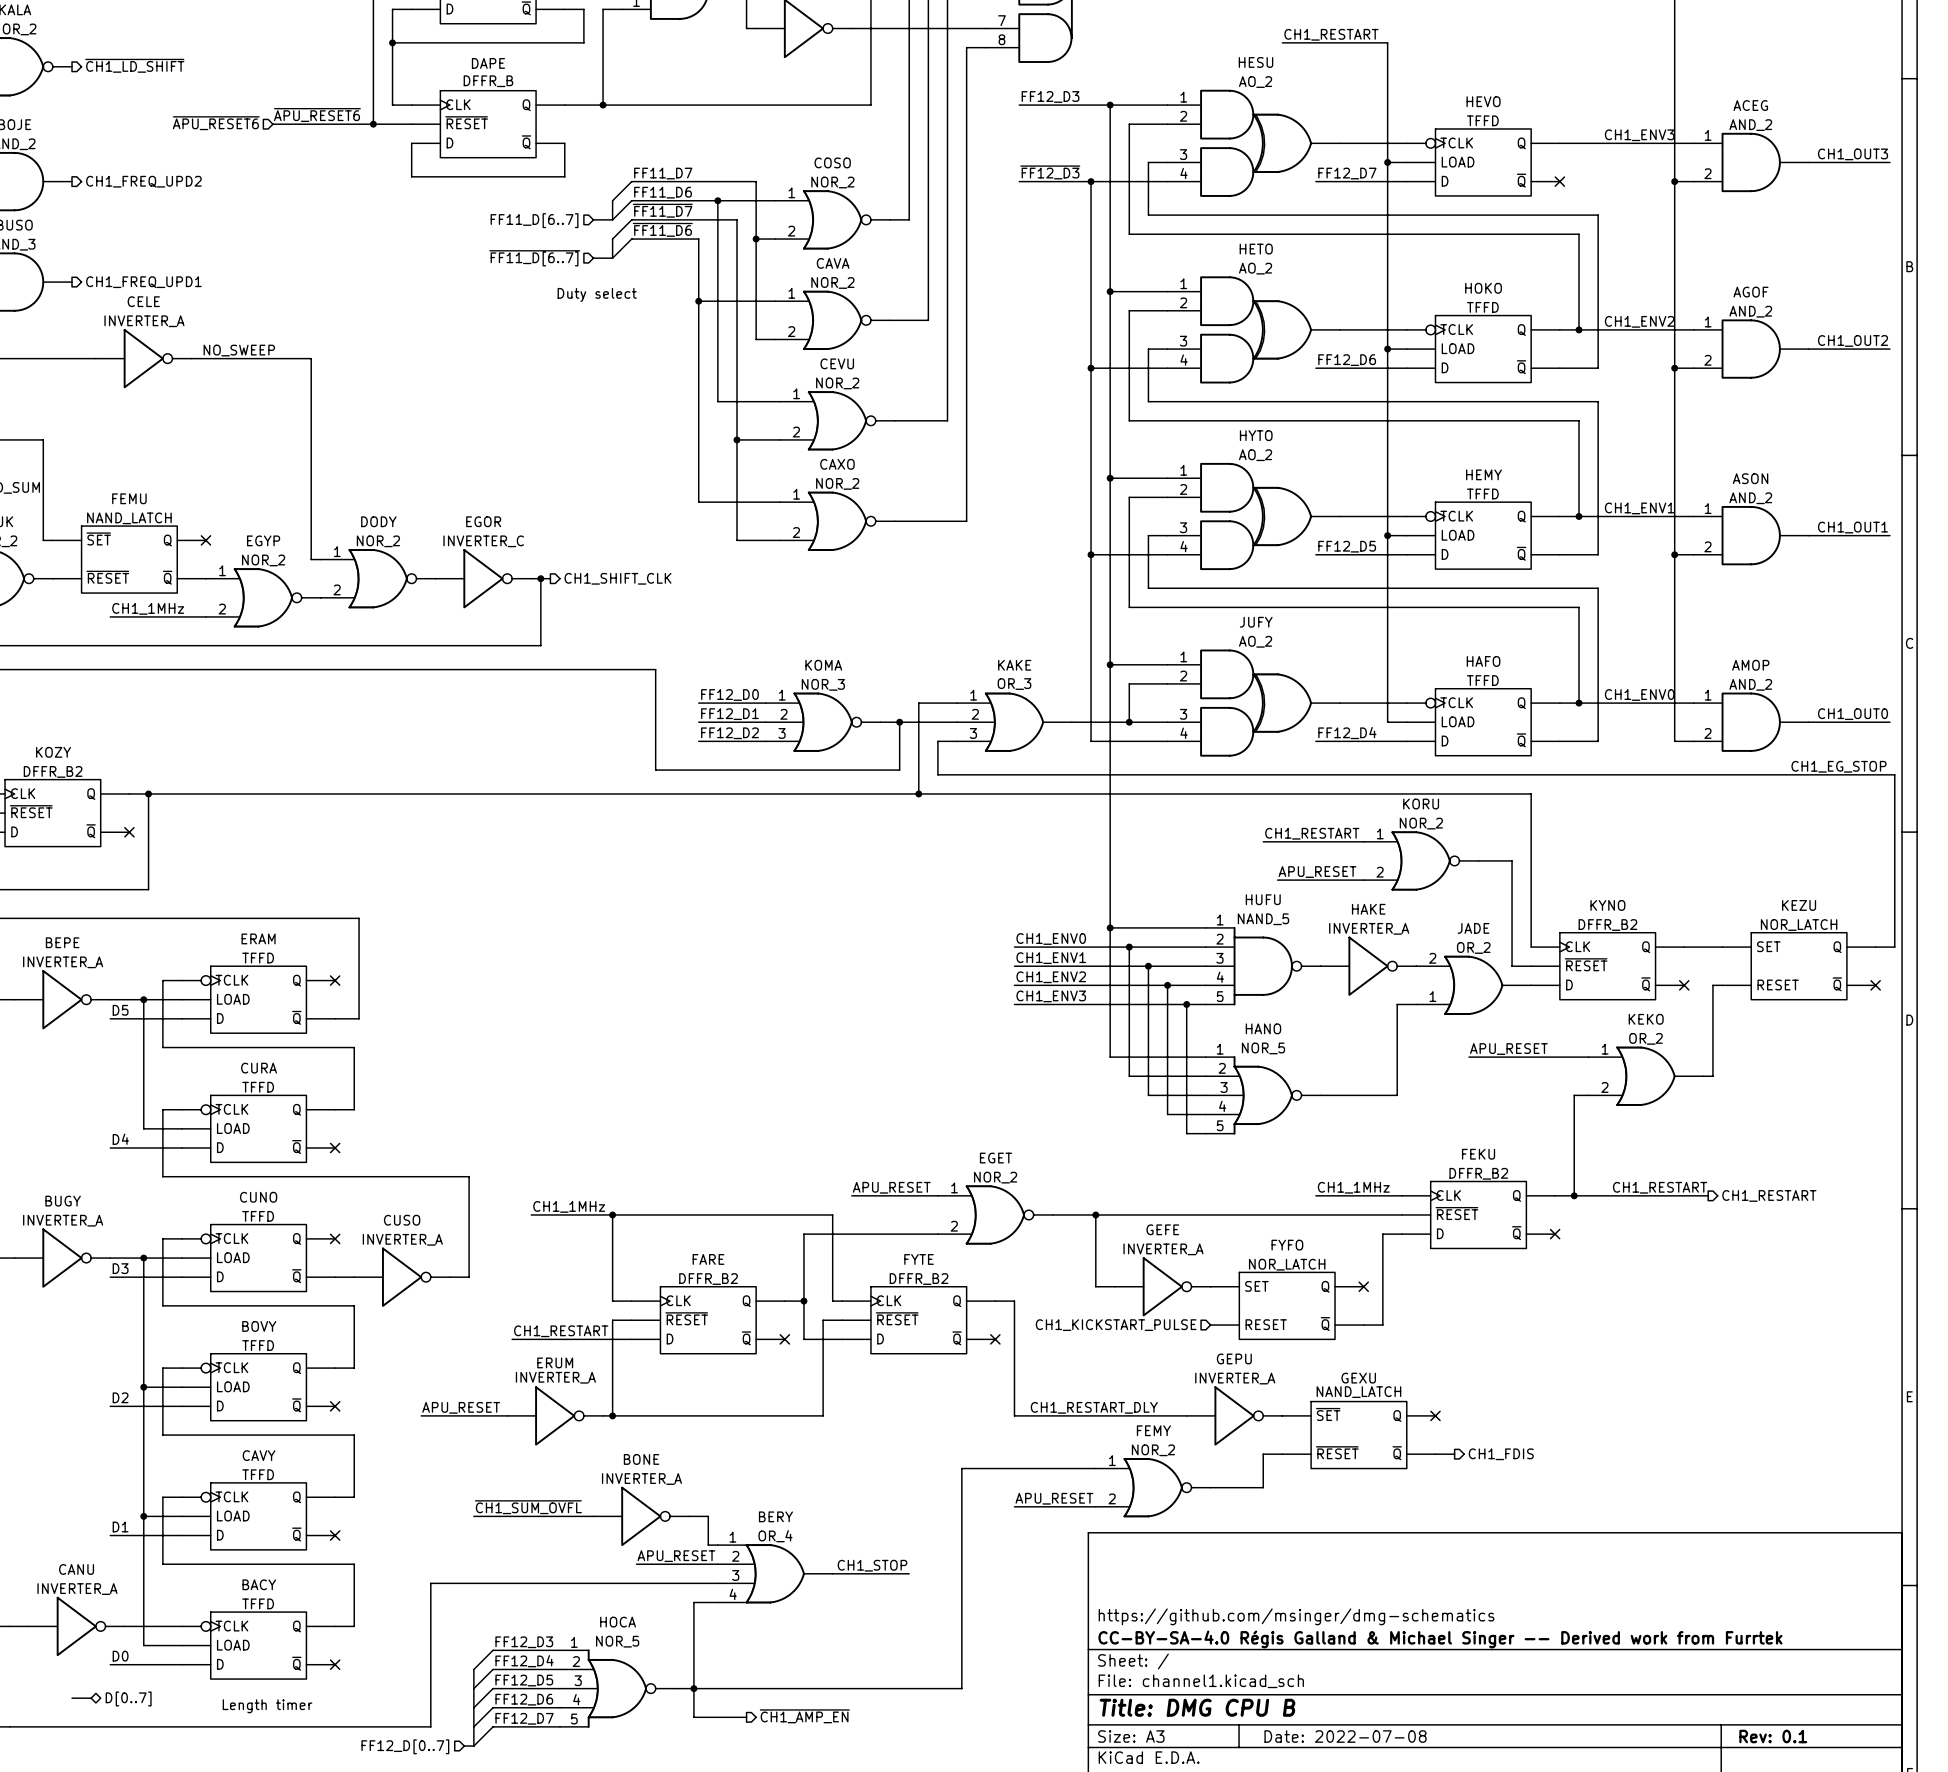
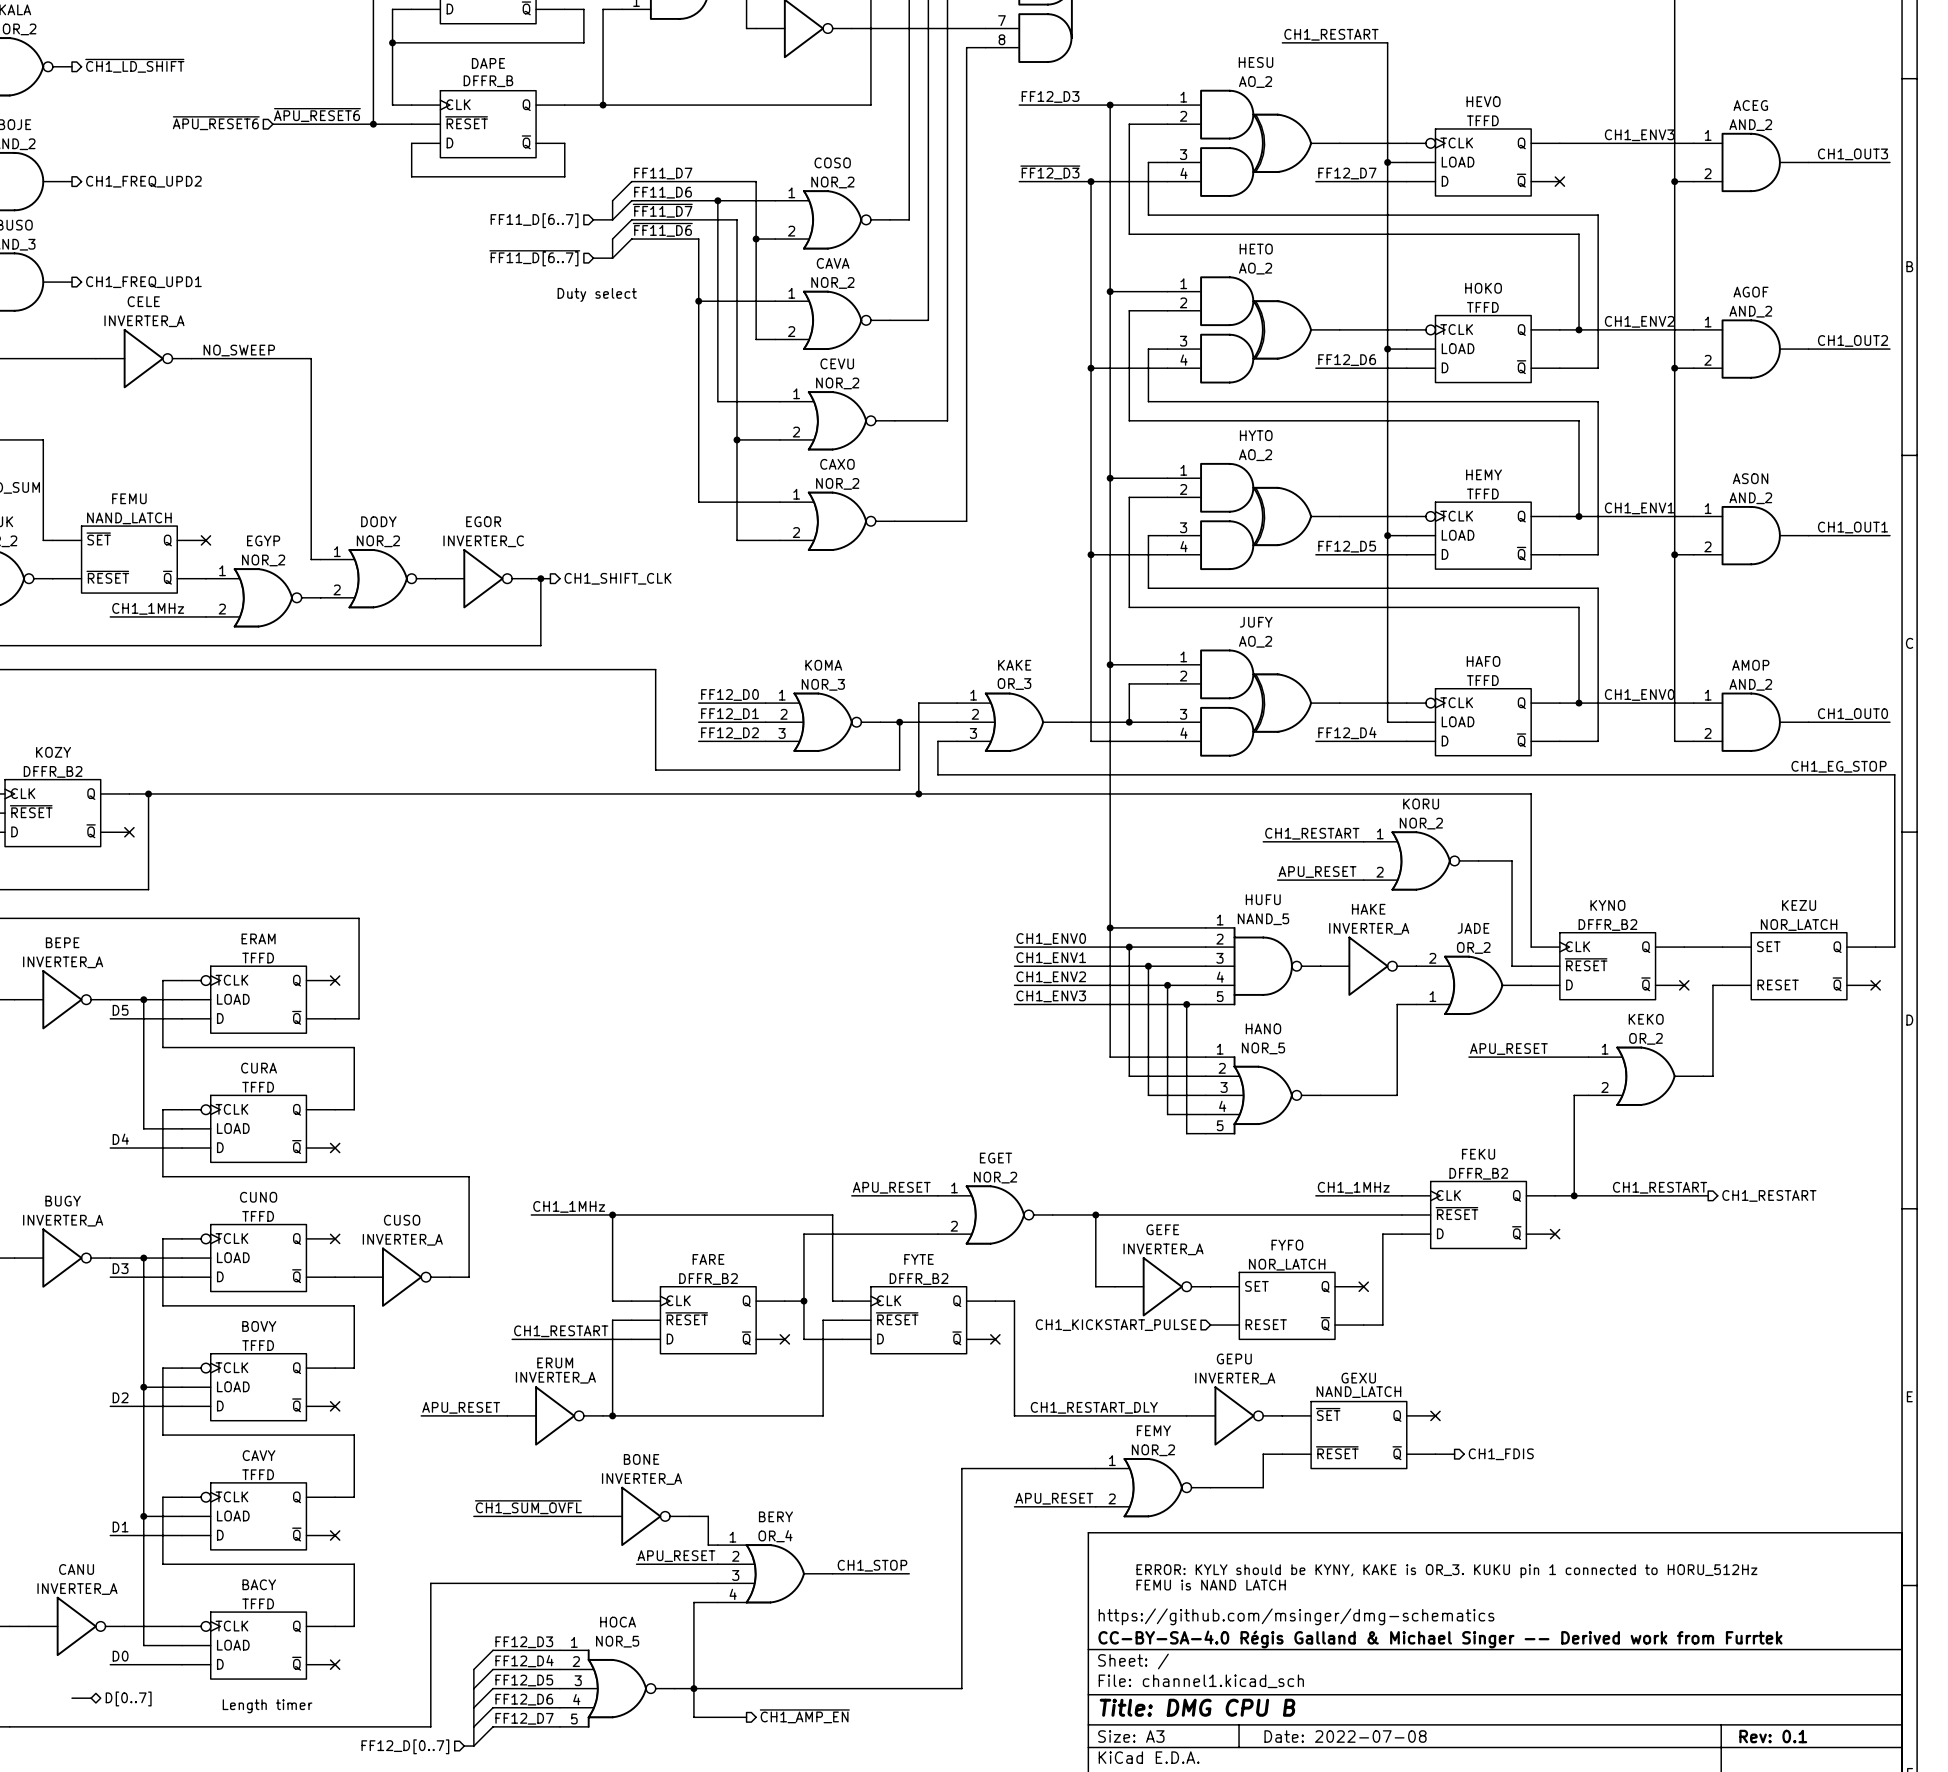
text: none -> ERROR: KYLY should be KYNY, KAKE is OR_3. KUKU pin 1 connected to HORU_512Hz (1446, 1571)
text: none -> FEMU is NAND LATCH (1211, 1585)

